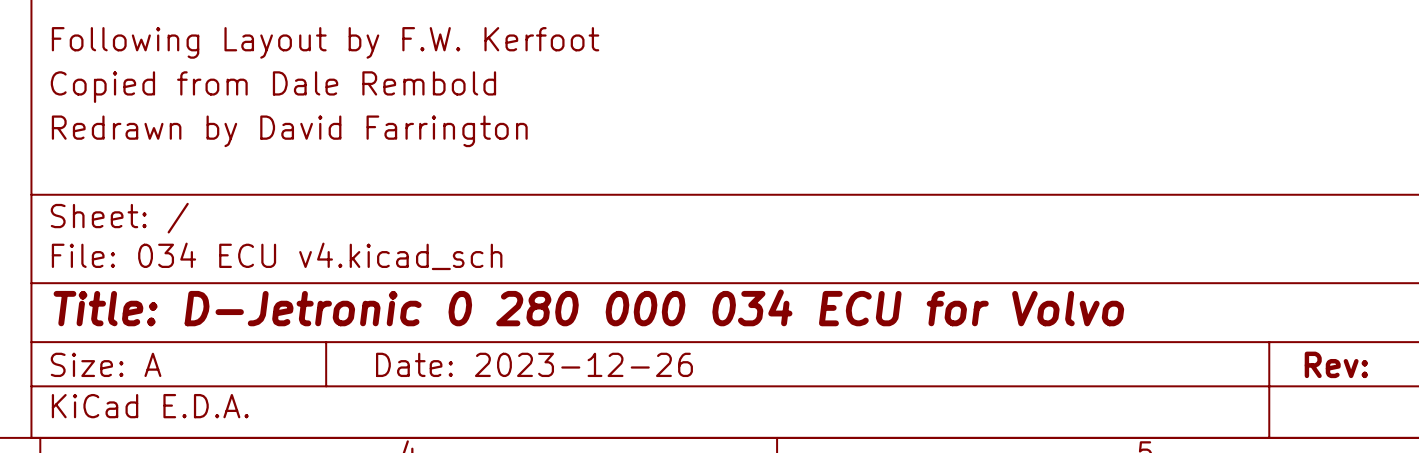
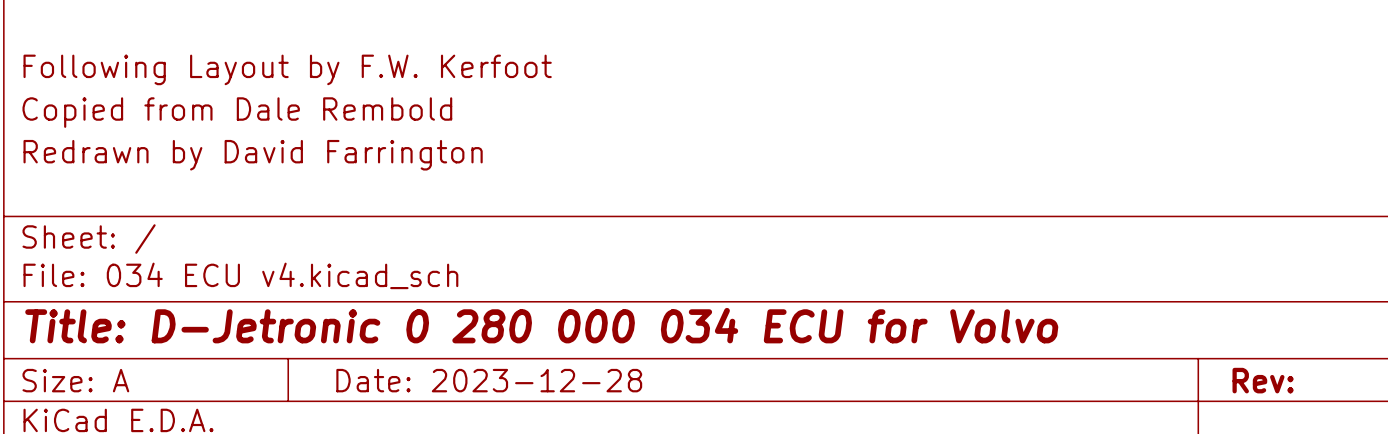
title block: Date: 2023-12-26 (534, 364) -> Date: 2023-12-28 (489, 380)

